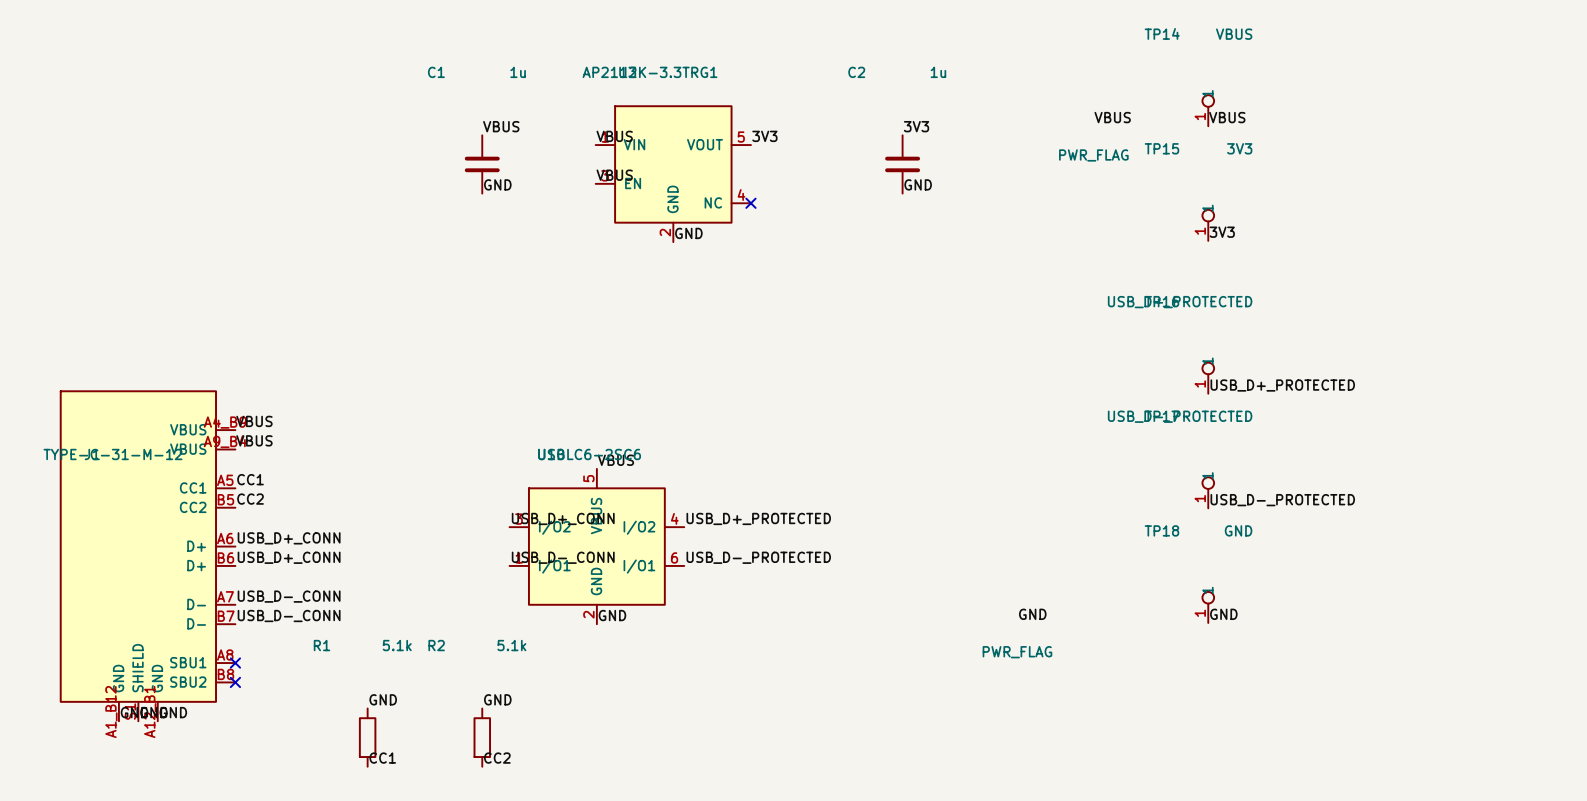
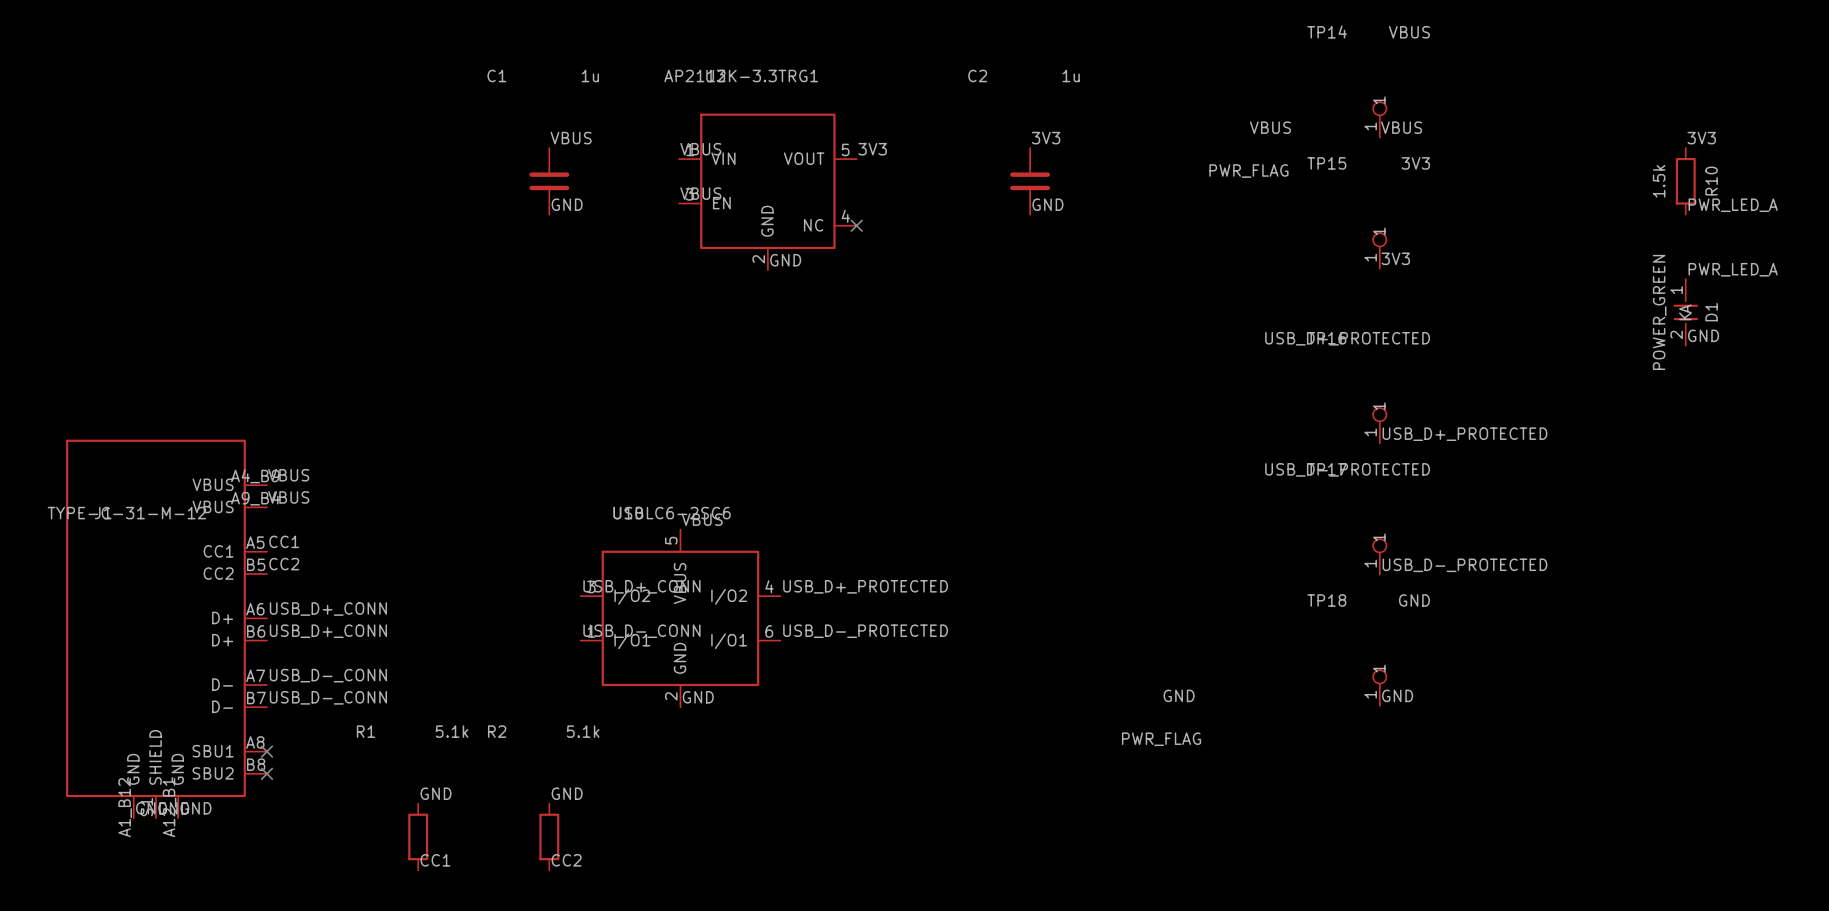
label: none -> 3V3 (1701, 138)
R10: none -> 1.5k (1685, 181)
label: none -> PWR_LED_A (1733, 205)
label: none -> PWR_LED_A (1733, 269)
D1: none -> POWER_GREEN (1685, 312)
label: none -> GND (1703, 335)

